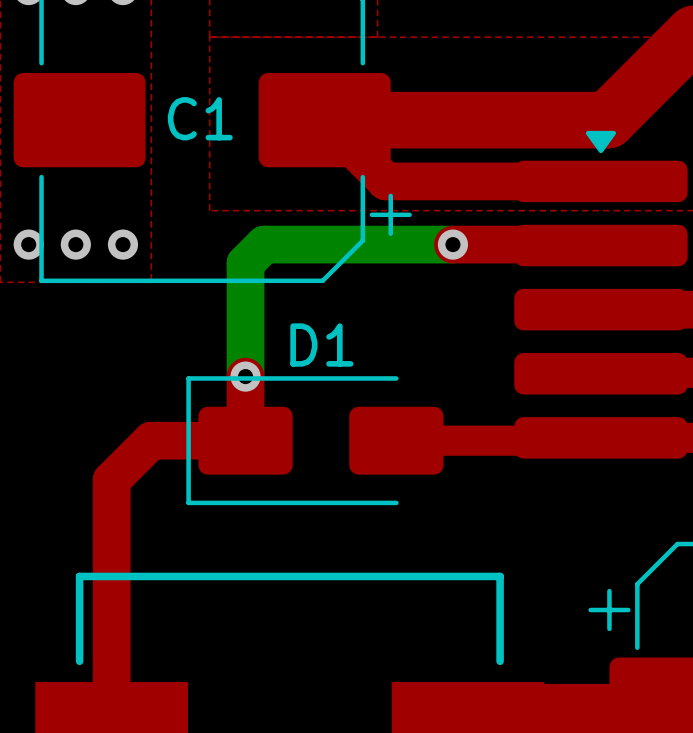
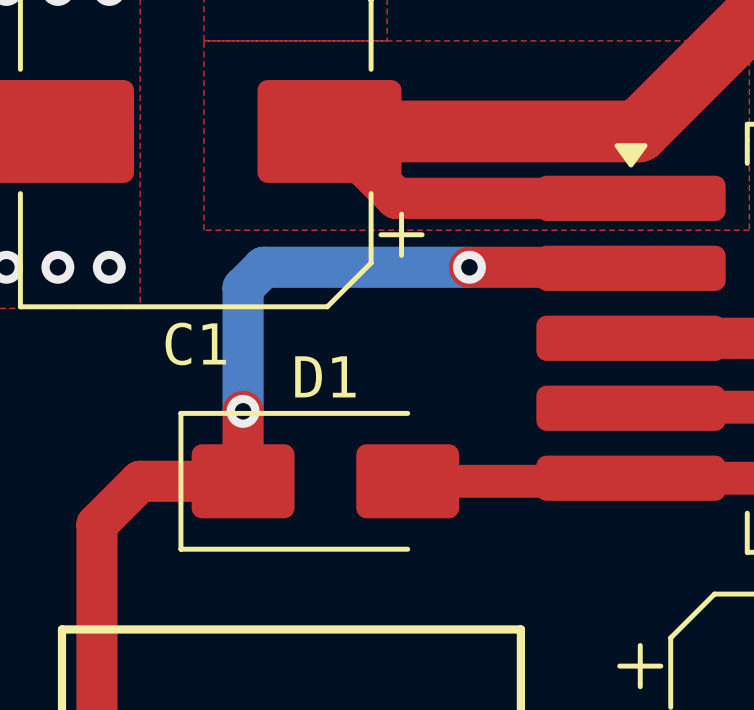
C1 name position: C1 (200, 118) -> C1 (195, 343)

